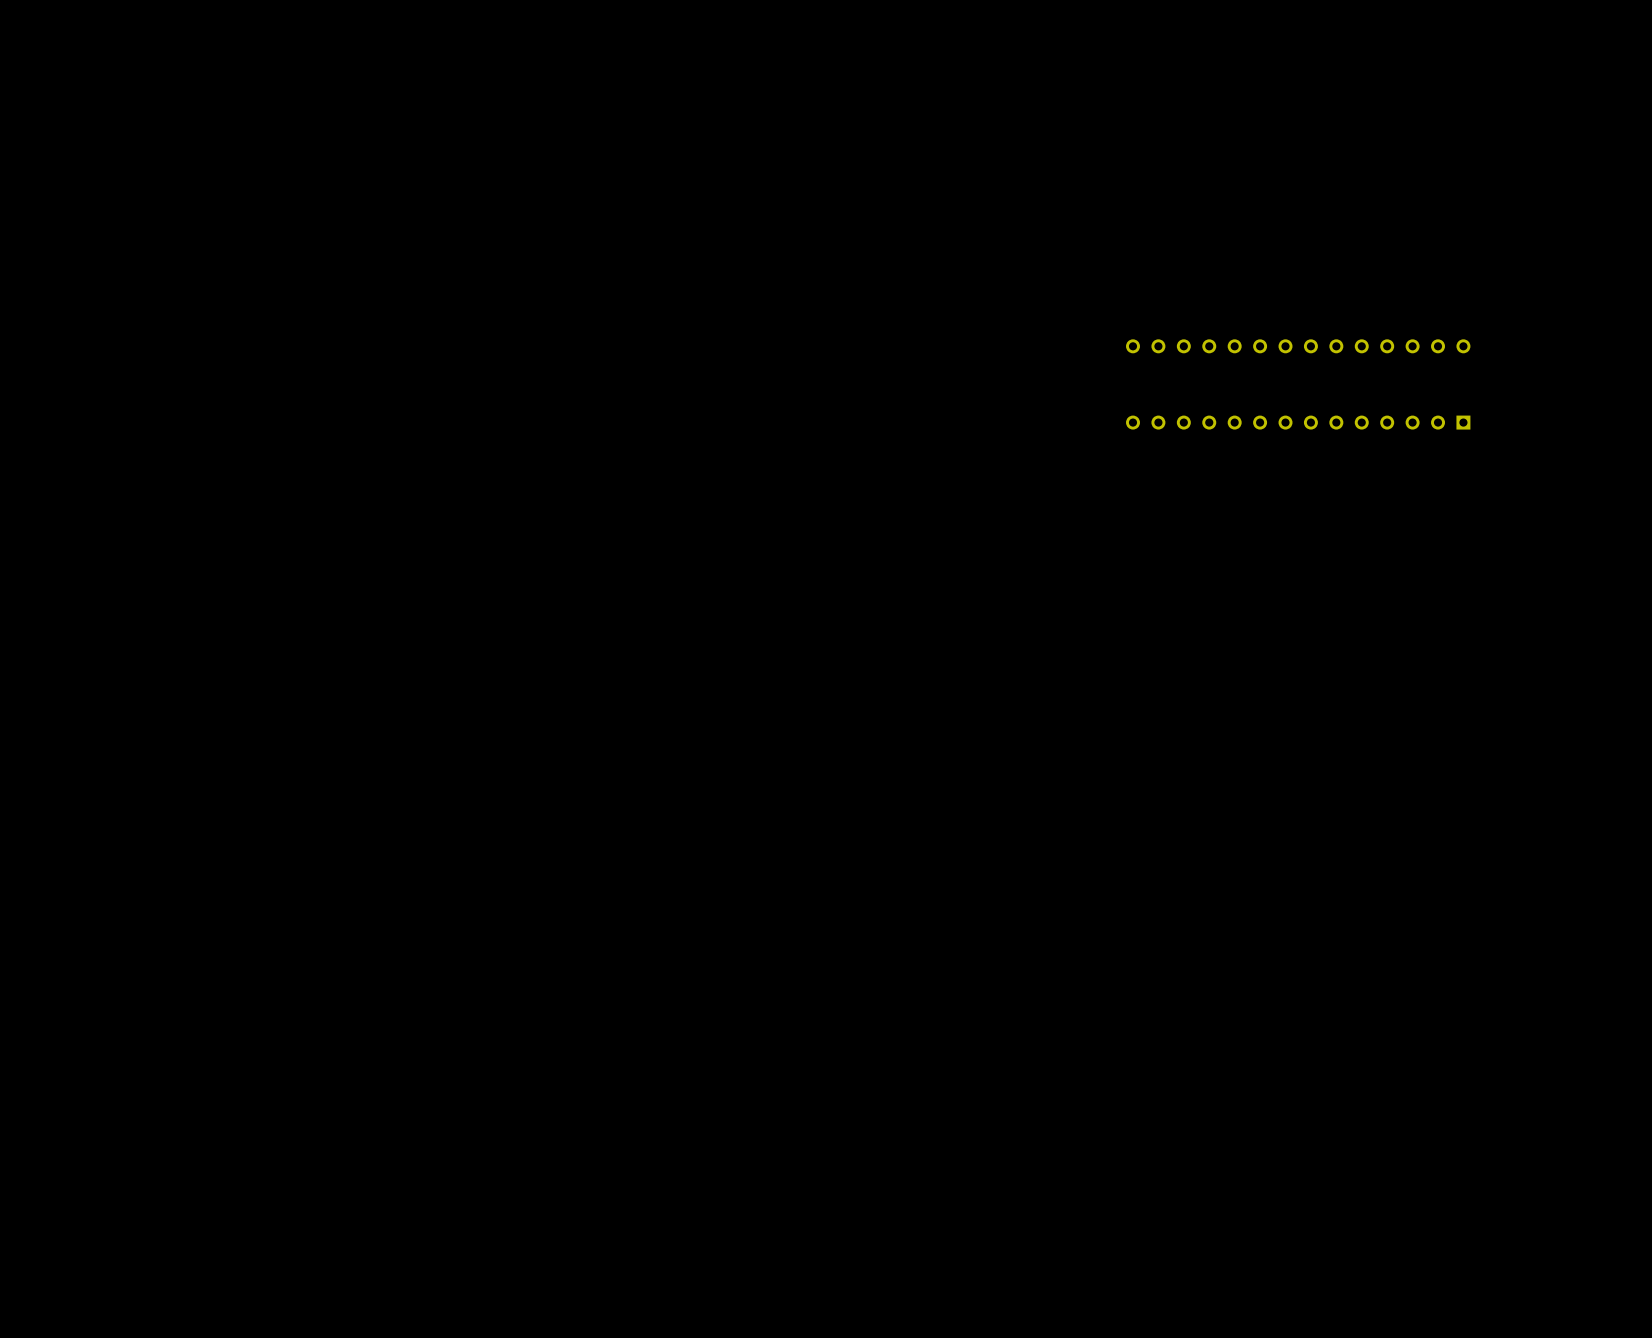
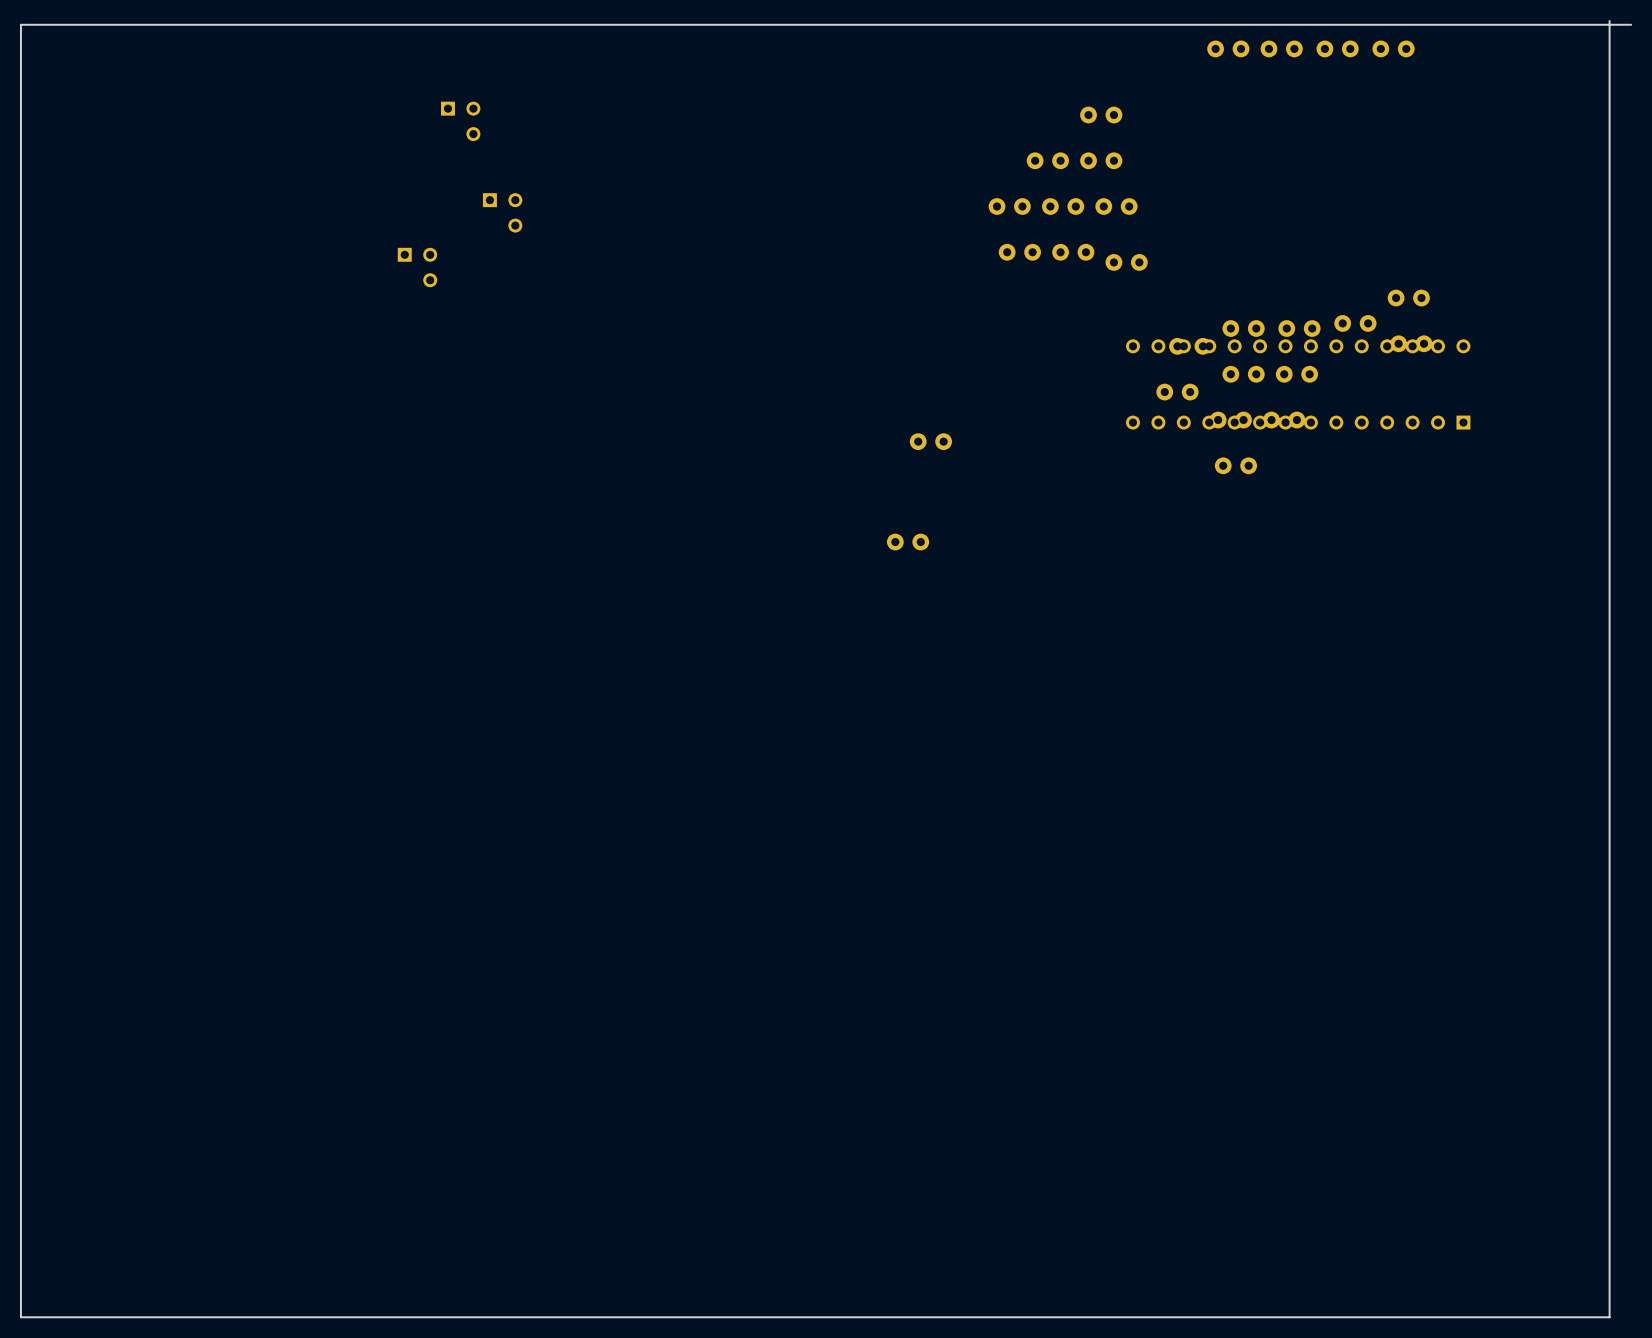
board edge: none -> (1609, 20) (1609, 1317) (20, 1317) (20, 24) (1631, 24)
part: none -> (1228, 48)
part: none -> (1281, 48)
part: none -> (1337, 48)
part: none -> (1393, 48)
part: none -> (1101, 115)
part: none -> (460, 121)
part: none -> (1047, 160)
part: none -> (1101, 160)
part: none -> (1009, 206)
part: none -> (1063, 206)
part: none -> (1116, 206)
part: none -> (502, 212)
part: none -> (1019, 252)
part: none -> (1073, 252)
part: none -> (1126, 262)
part: none -> (417, 267)
part: none -> (1408, 298)
part: none -> (1355, 323)
part: none -> (1243, 328)
part: none -> (1299, 328)
part: none -> (1411, 343)
part: none -> (1190, 346)
part: none -> (1243, 374)
part: none -> (1296, 374)
part: none -> (1177, 392)
part: none -> (1230, 420)
part: none -> (1284, 420)
part: none -> (930, 441)
part: none -> (1235, 465)
part: none -> (908, 542)

